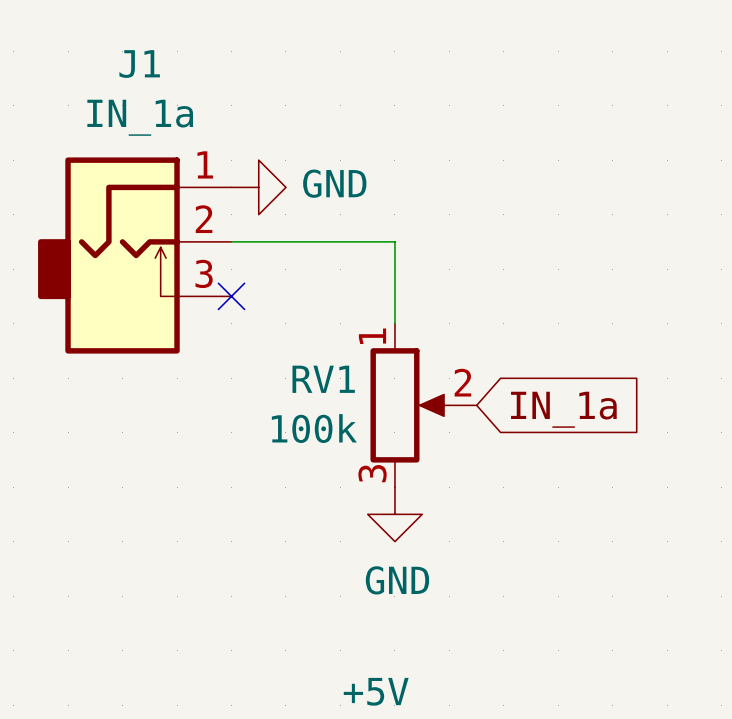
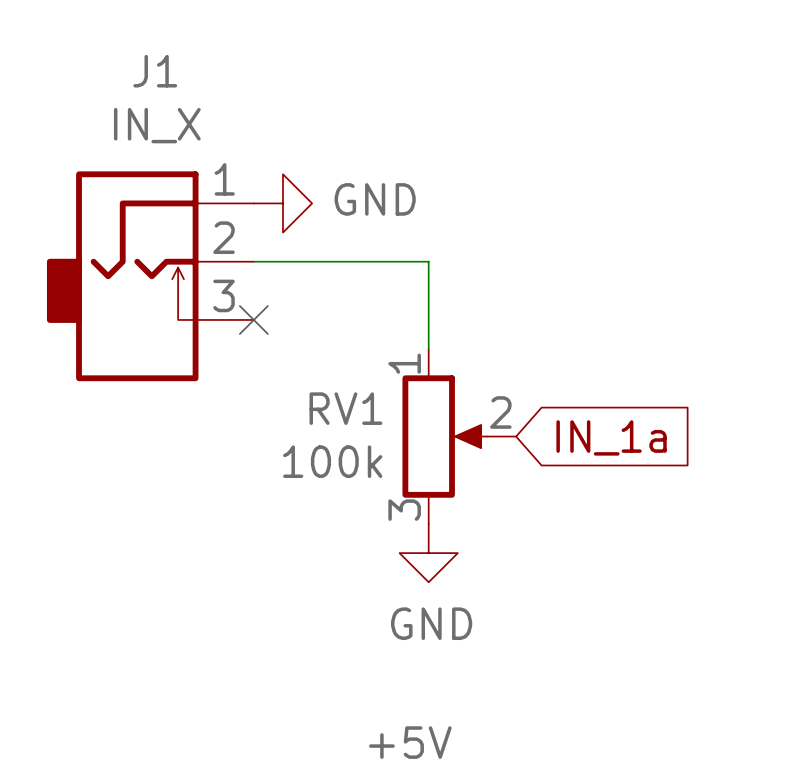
J1 value: IN_1a (140, 117) -> IN_X (157, 125)

